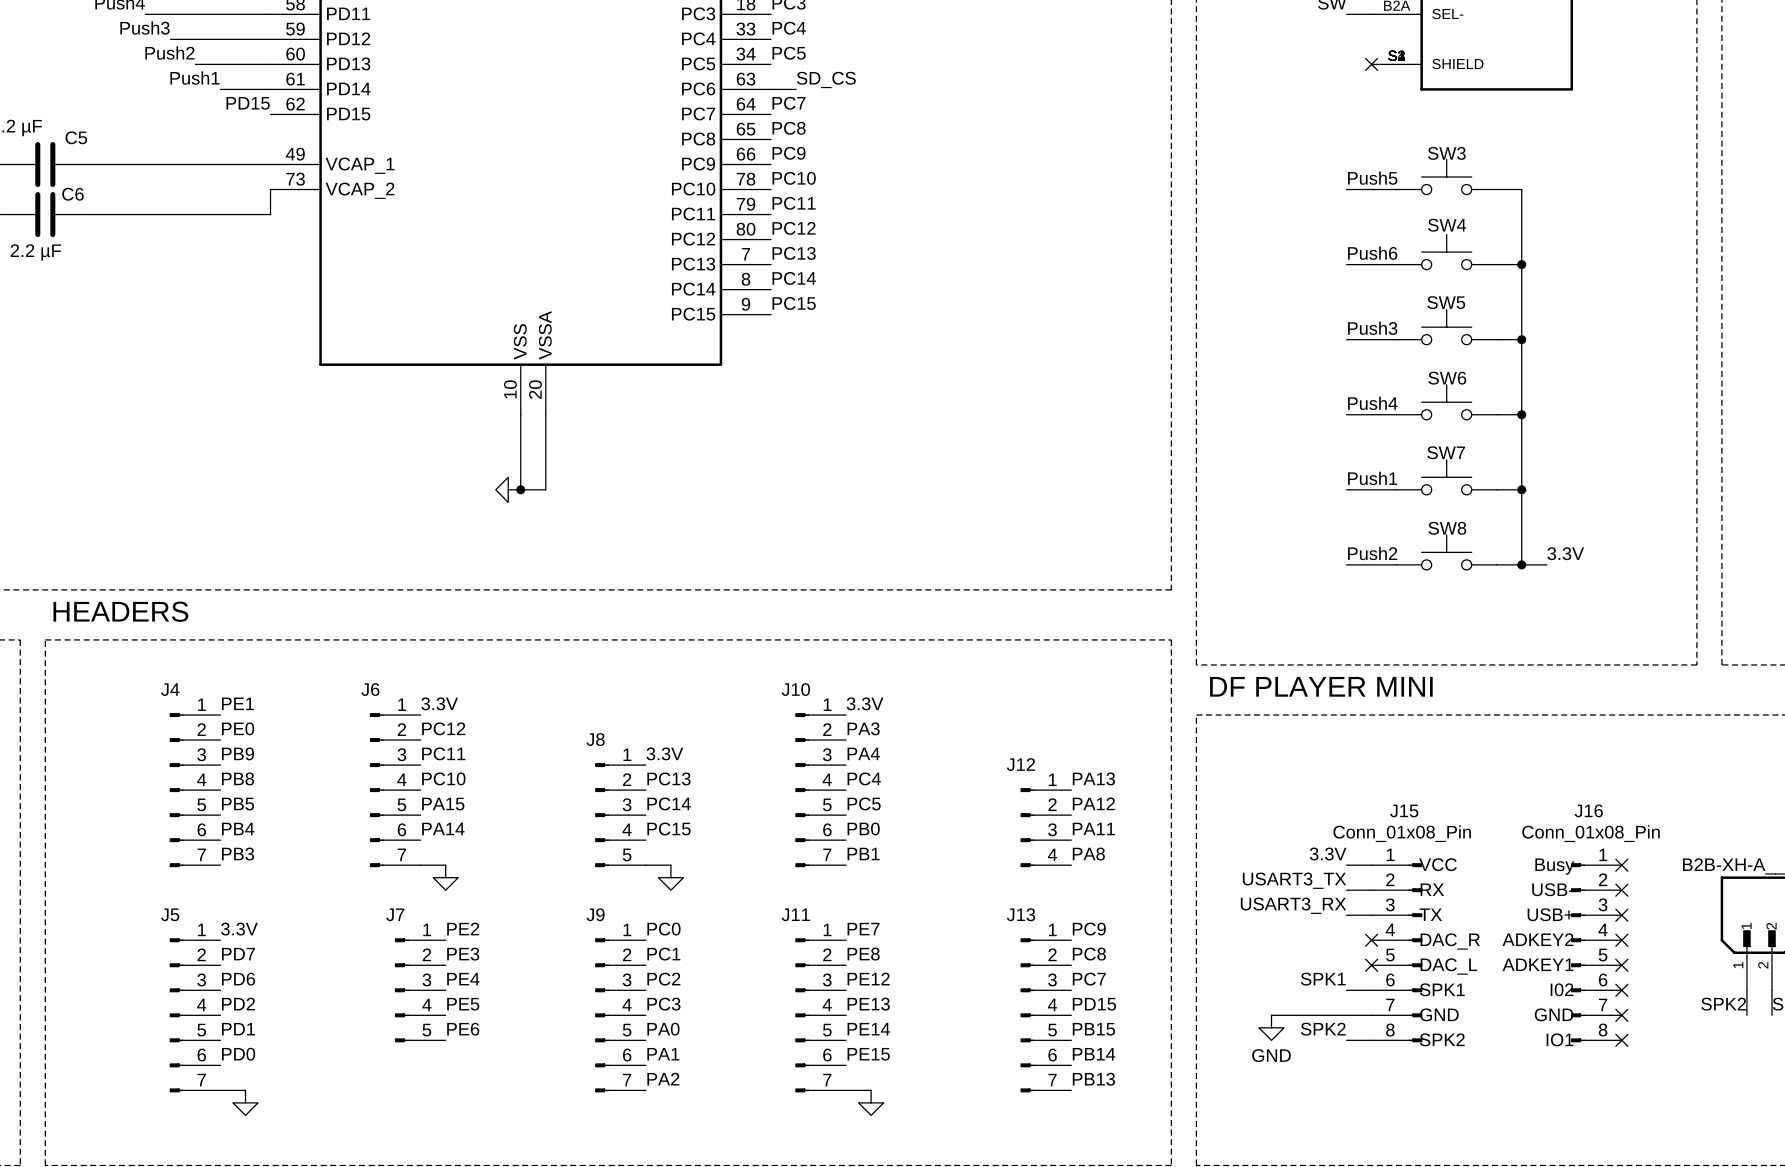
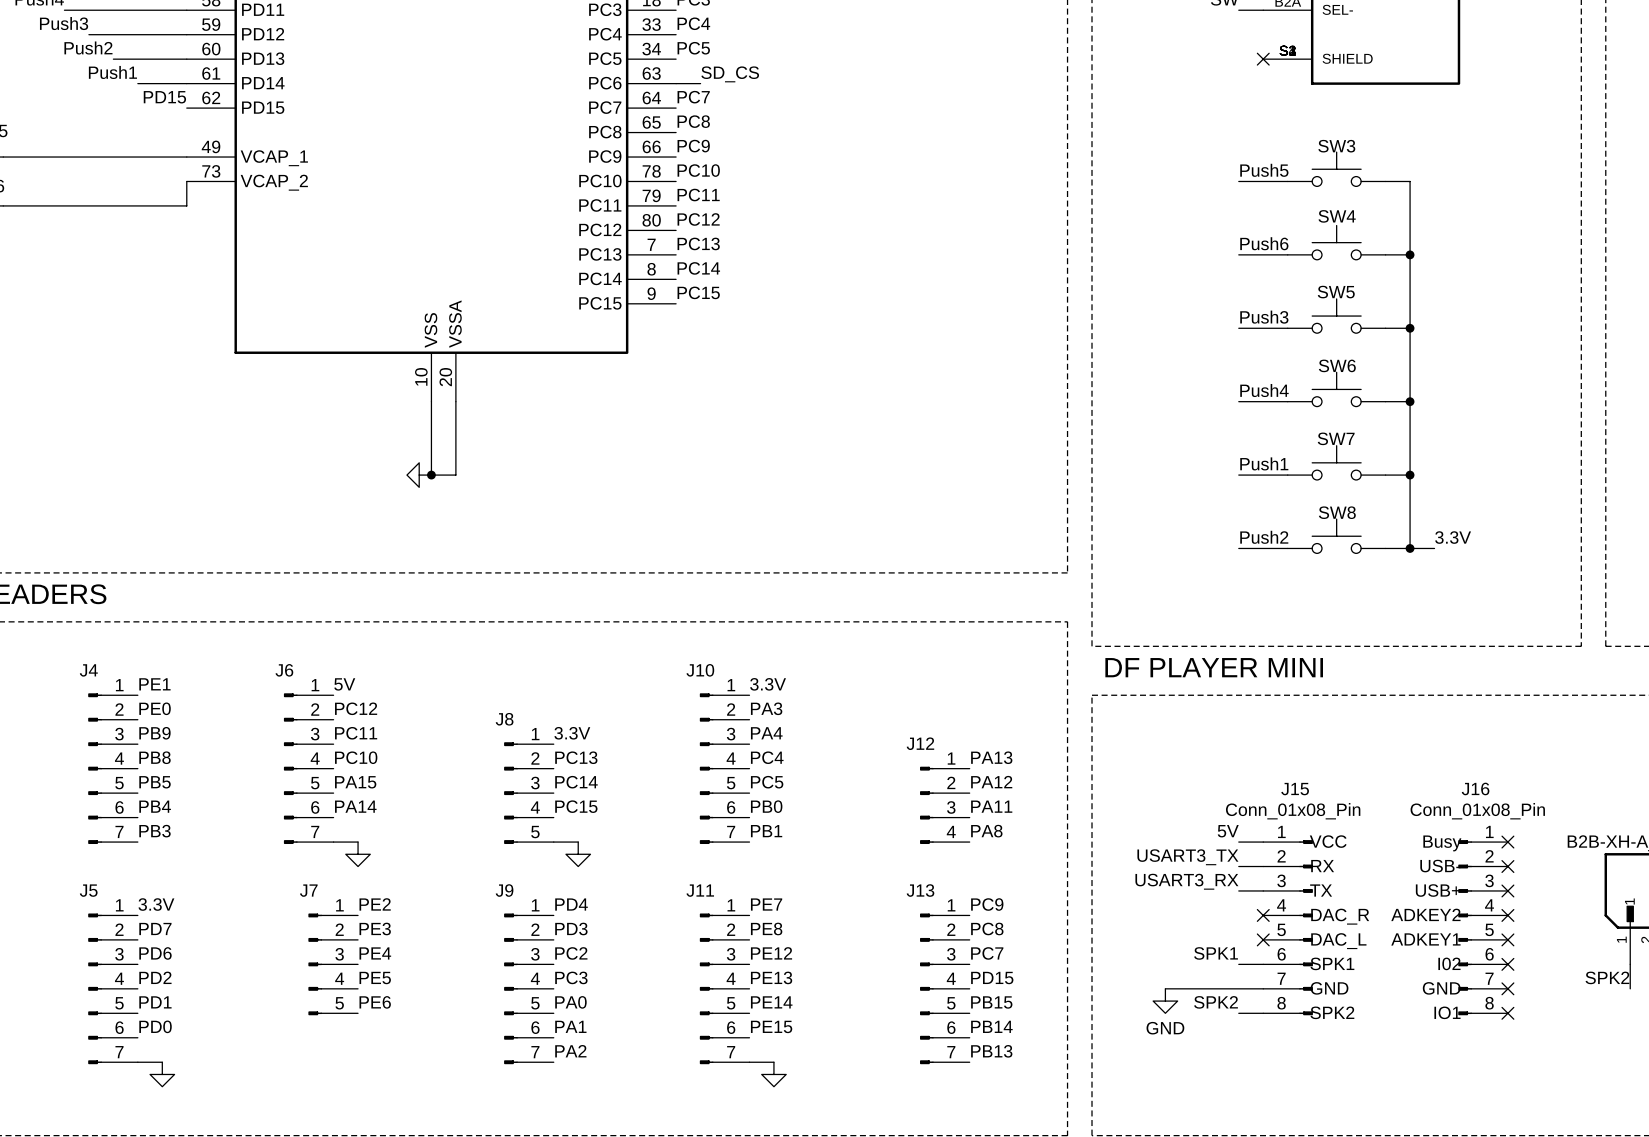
label: 3.3V (439, 703) -> 5V (344, 684)
label: 3.3V (1328, 854) -> 5V (1228, 831)
label: PC0 (663, 929) -> PD4 (571, 904)
label: PC1 (663, 954) -> PD3 (571, 928)

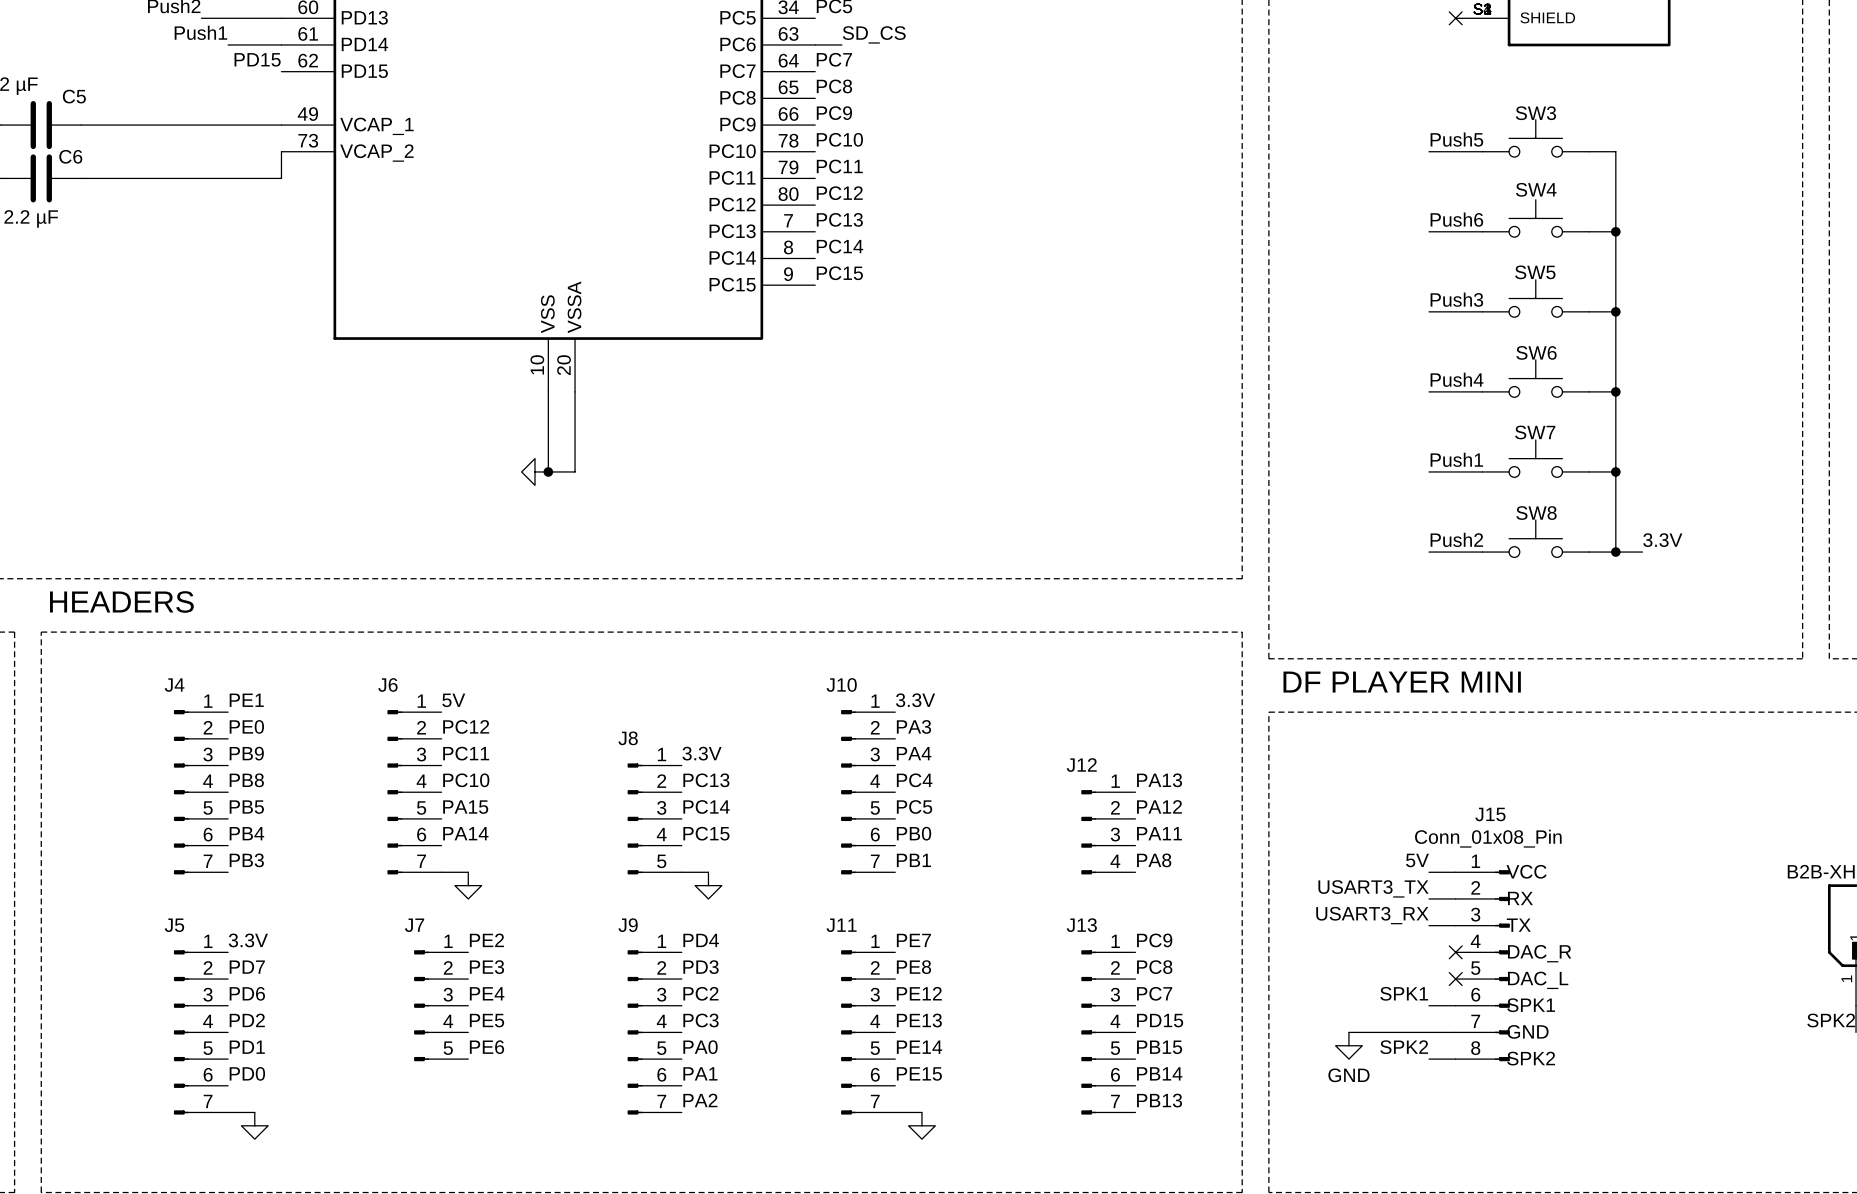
no-connect mark: (1507, 842) -> none
no-connect mark: (1507, 866) -> none
no-connect mark: (1507, 890) -> none
no-connect mark: (1507, 915) -> none
J16: Conn_01x08_Pin (1483, 927) -> none
no-connect mark: (1507, 939) -> none
no-connect mark: (1507, 964) -> none
no-connect mark: (1507, 988) -> none
no-connect mark: (1507, 1013) -> none

